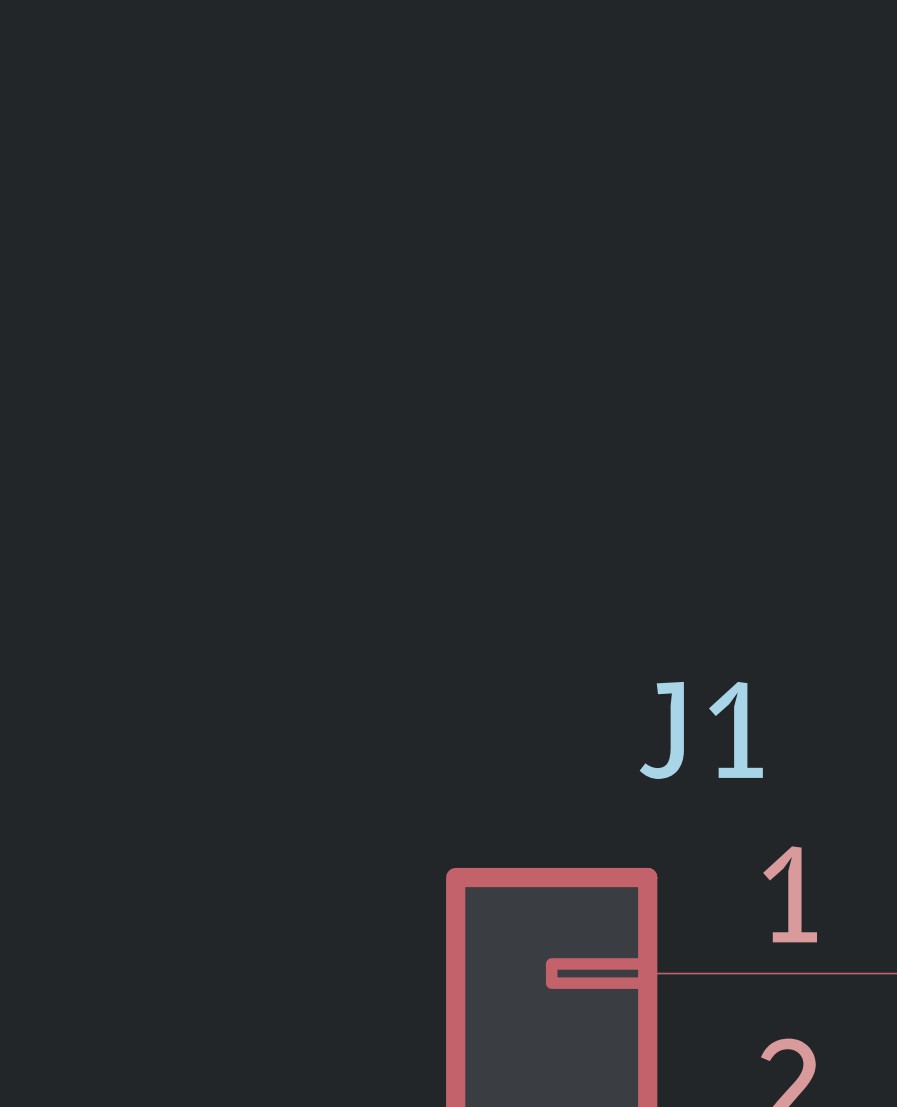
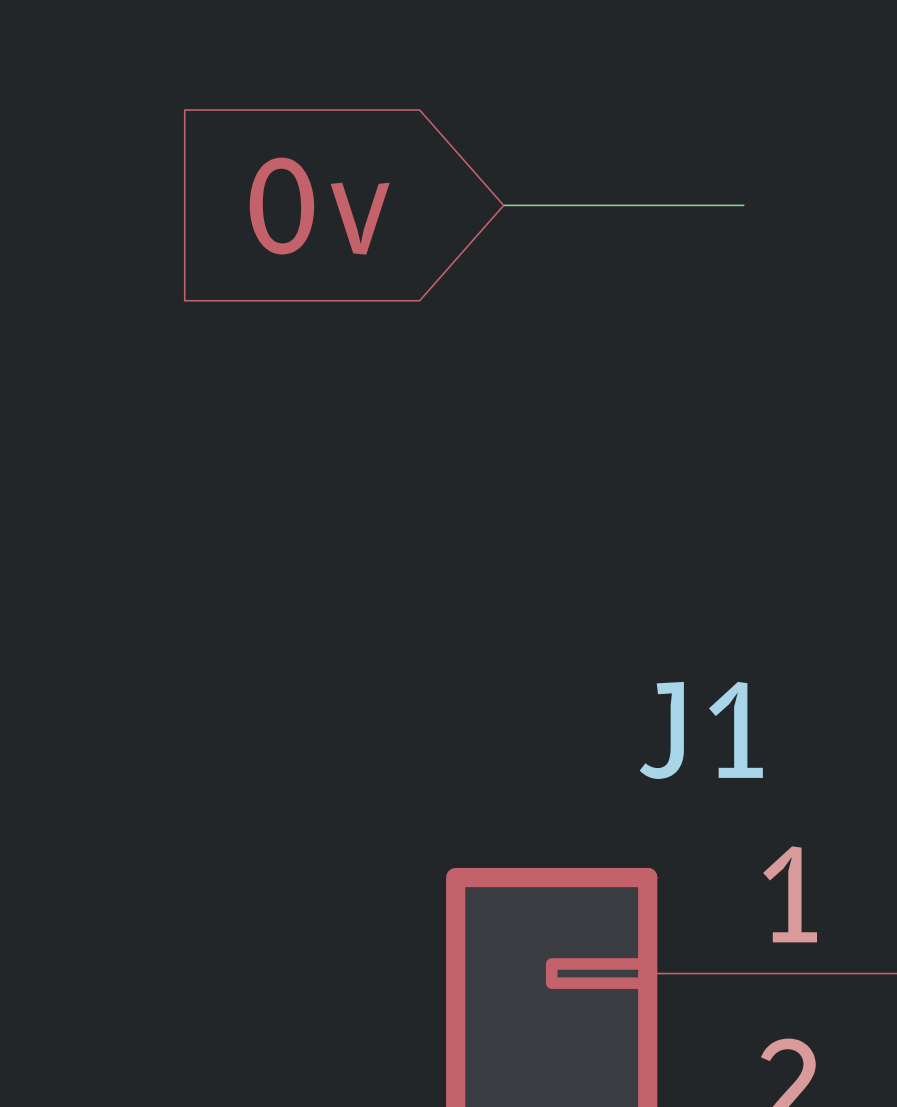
wire: none -> (503, 205) (743, 205)
global label: none -> 0v (319, 206)

